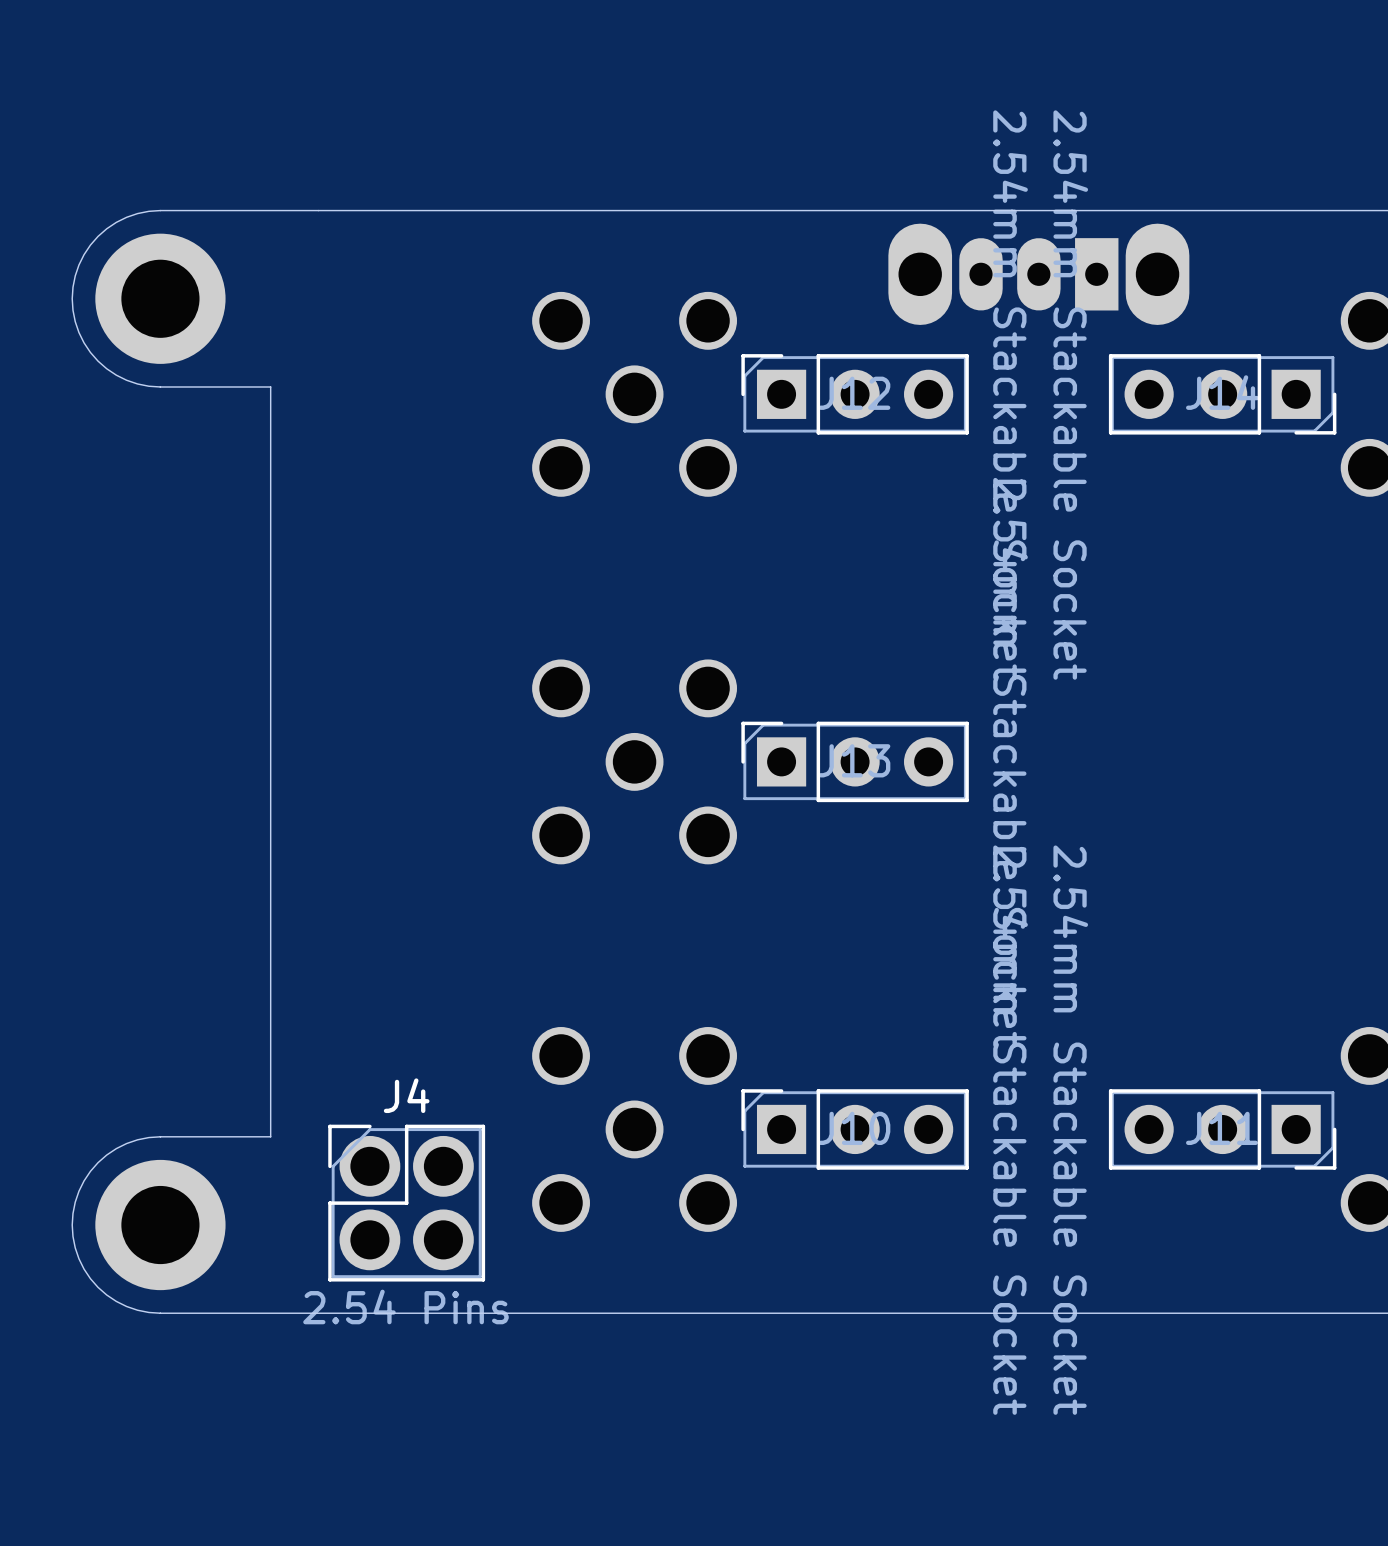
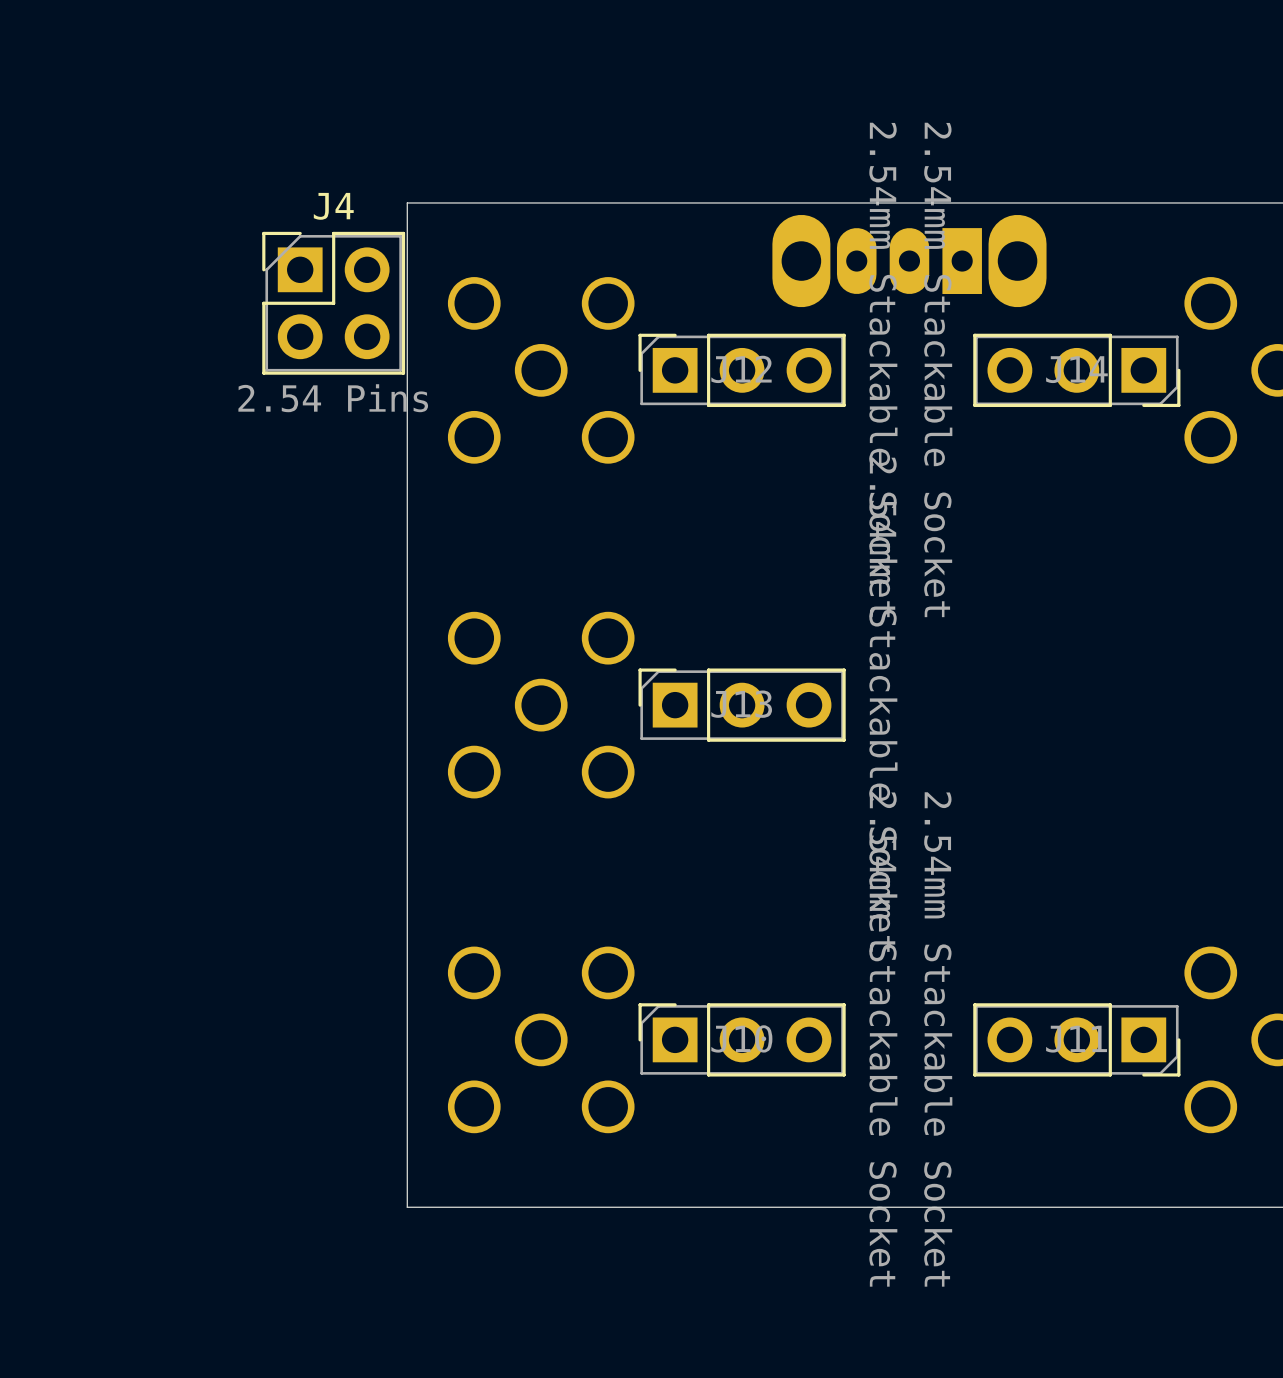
board edge: (487, 210) (160, 210) (137, 213) (126, 217) (106, 228) (90, 245) (84, 254) (75, 275) (72, 298) (75, 321) (84, 342) (90, 352) (106, 368) (126, 380) (148, 386) (160, 386) (270, 386) (270, 1136) (148, 1137) (126, 1143) (116, 1148) (98, 1162) (90, 1171) (84, 1180) (75, 1202) (72, 1225) (72, 1236) (78, 1258) (90, 1278) (106, 1294) (126, 1306) (148, 1312) (487, 1313) -> (407, 202) (407, 1207)
part: (160, 298) -> none
J4 footprint: [328, 1124, 486, 1282] -> [262, 231, 406, 375]
part: (160, 1225) -> none

